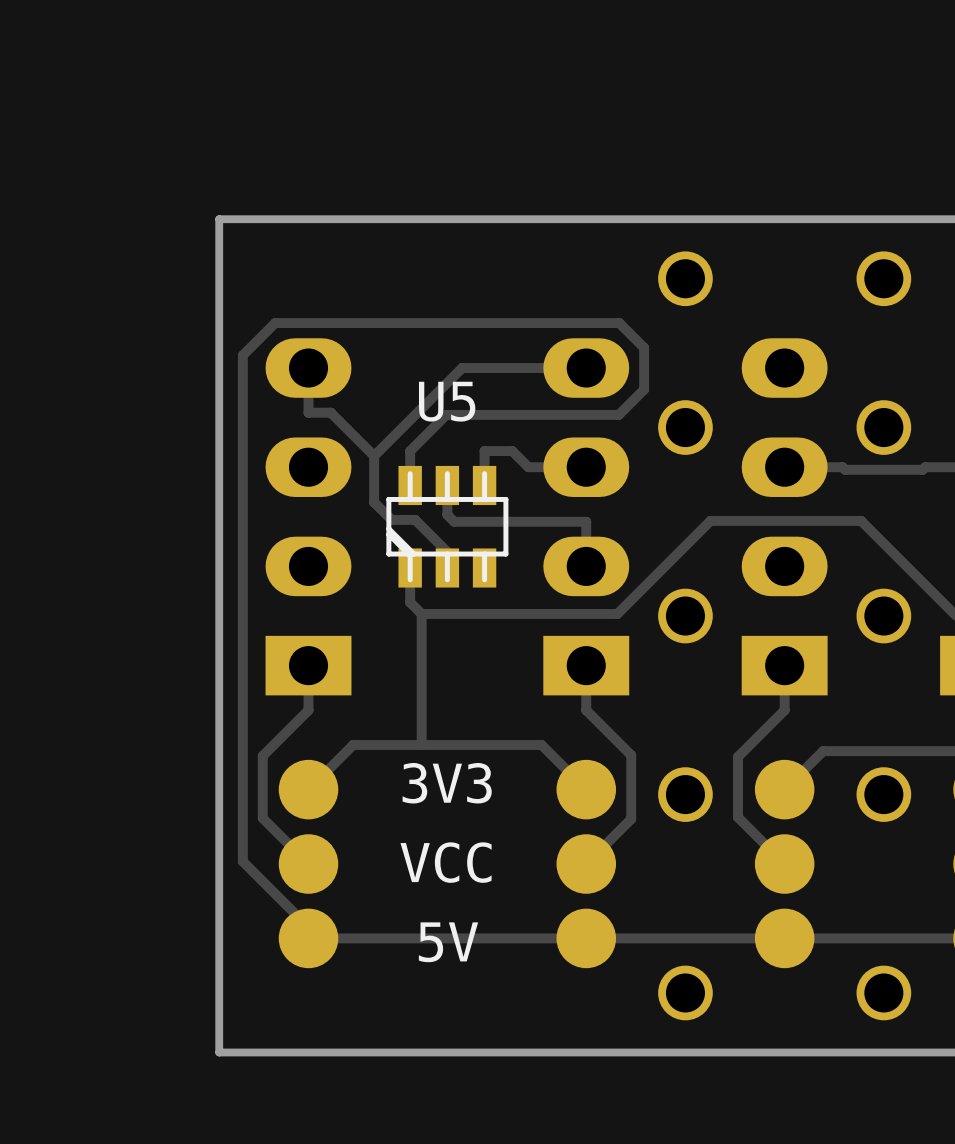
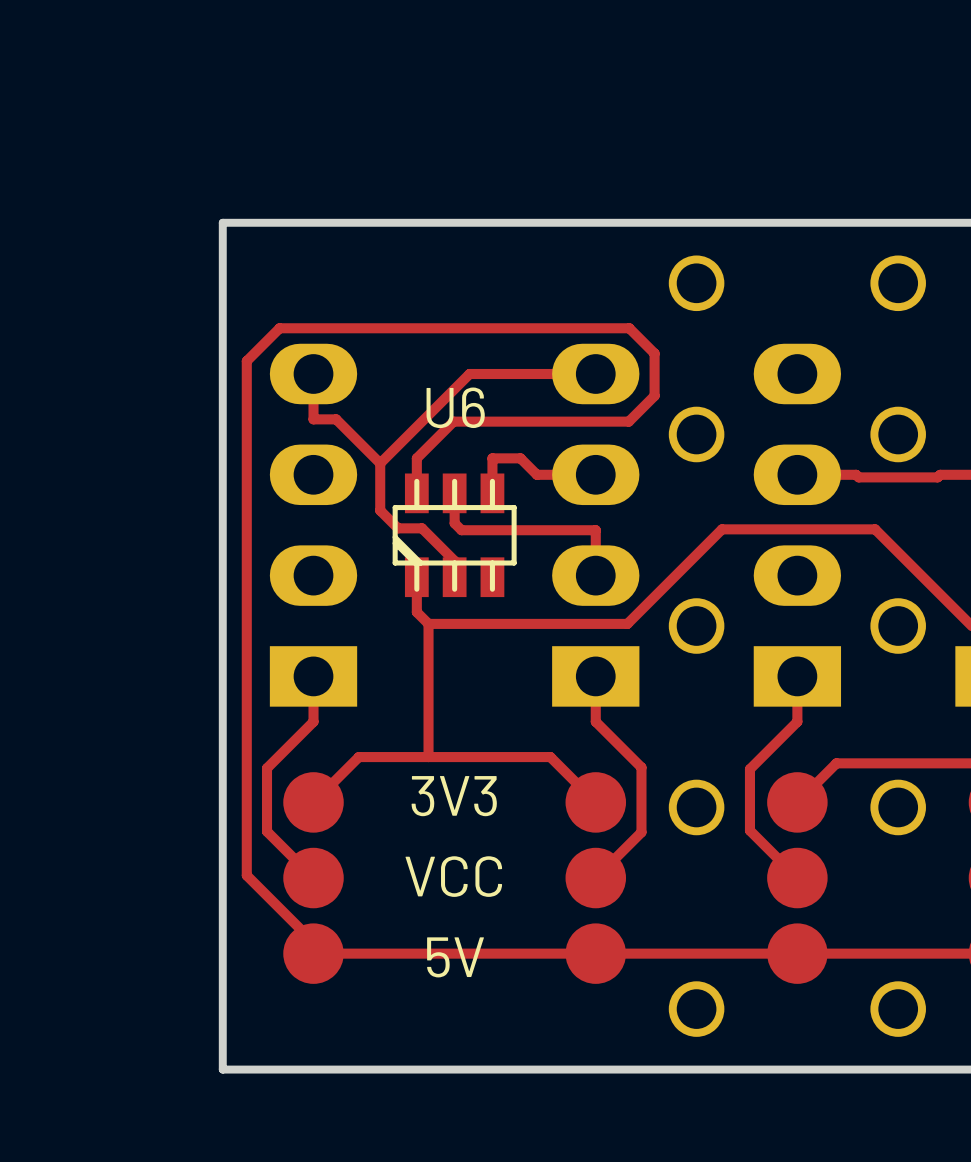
U5 name: U5 (447, 401) -> U6 (455, 407)

